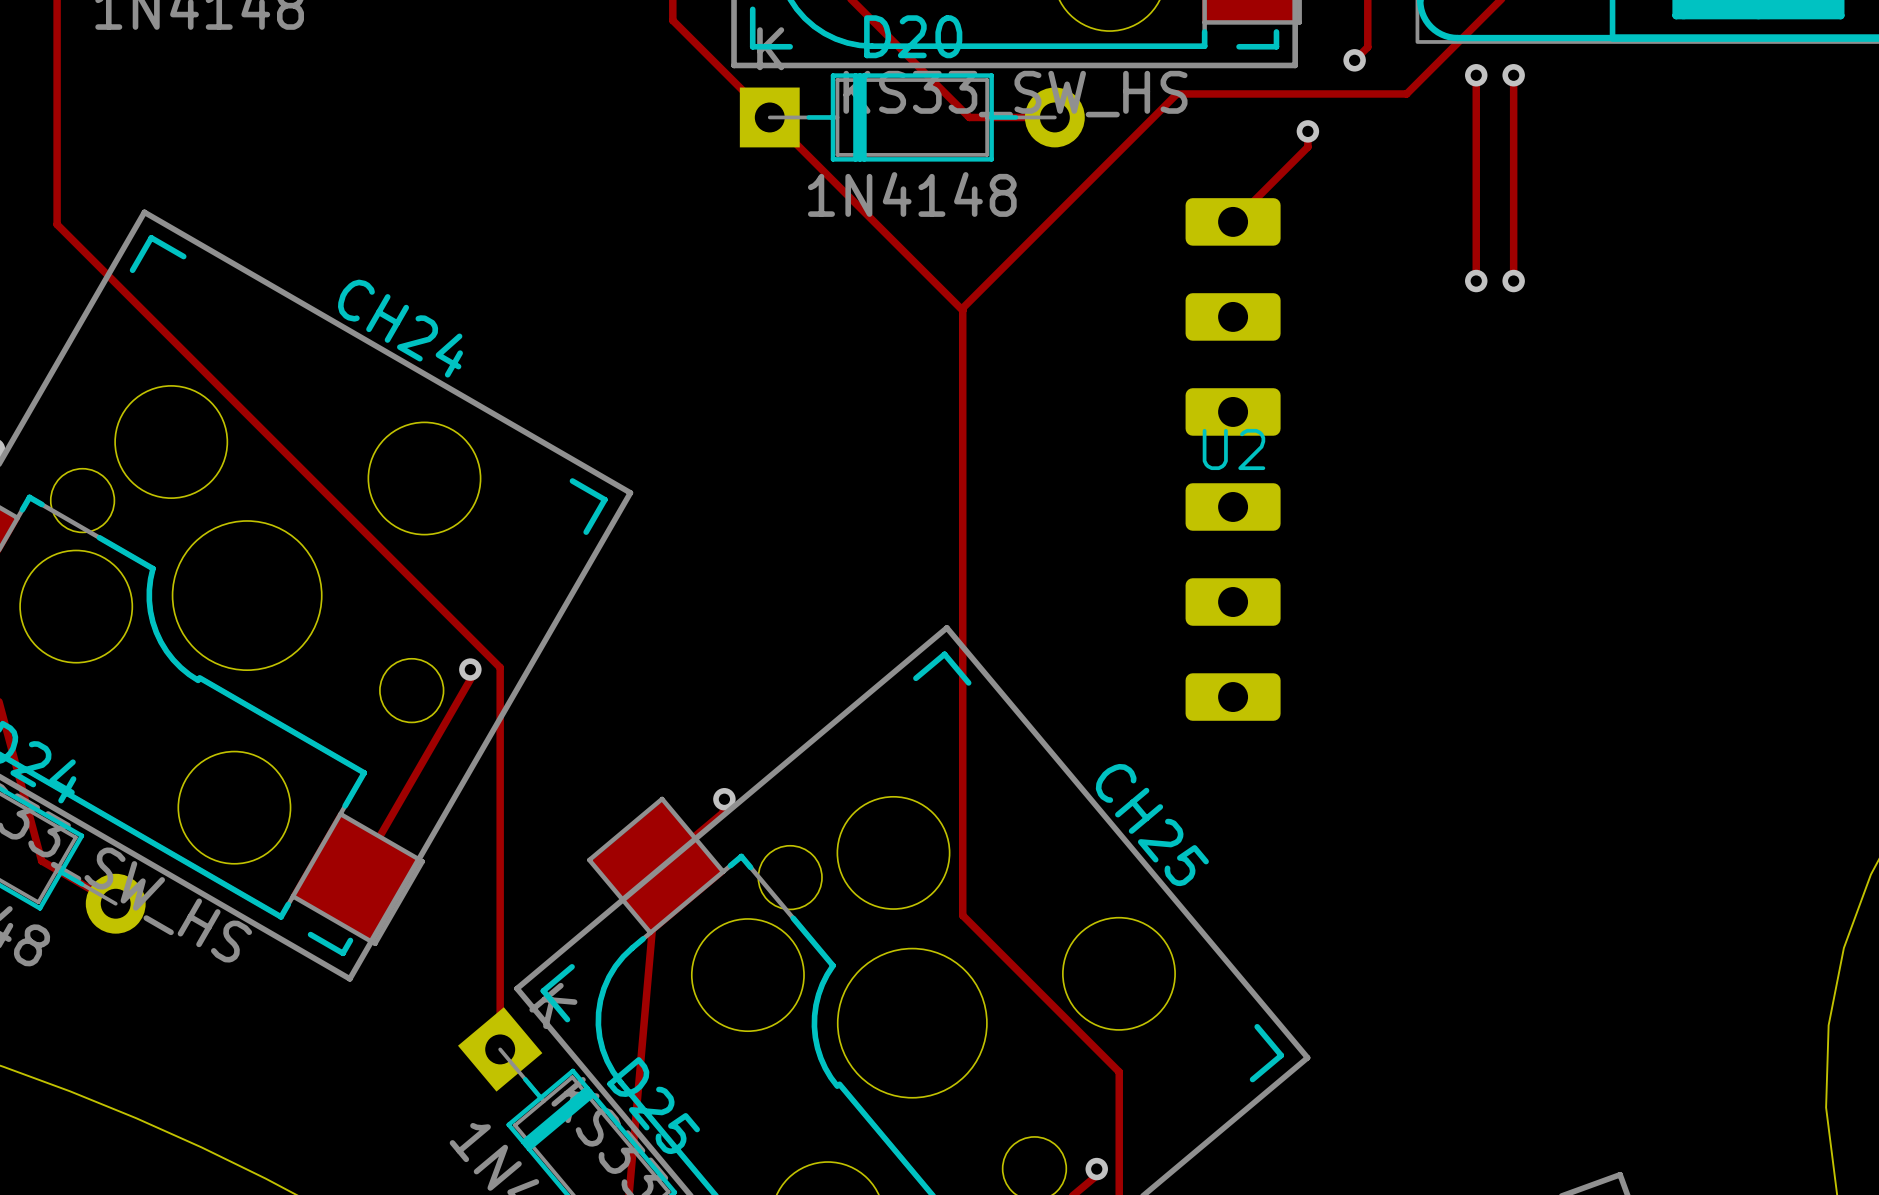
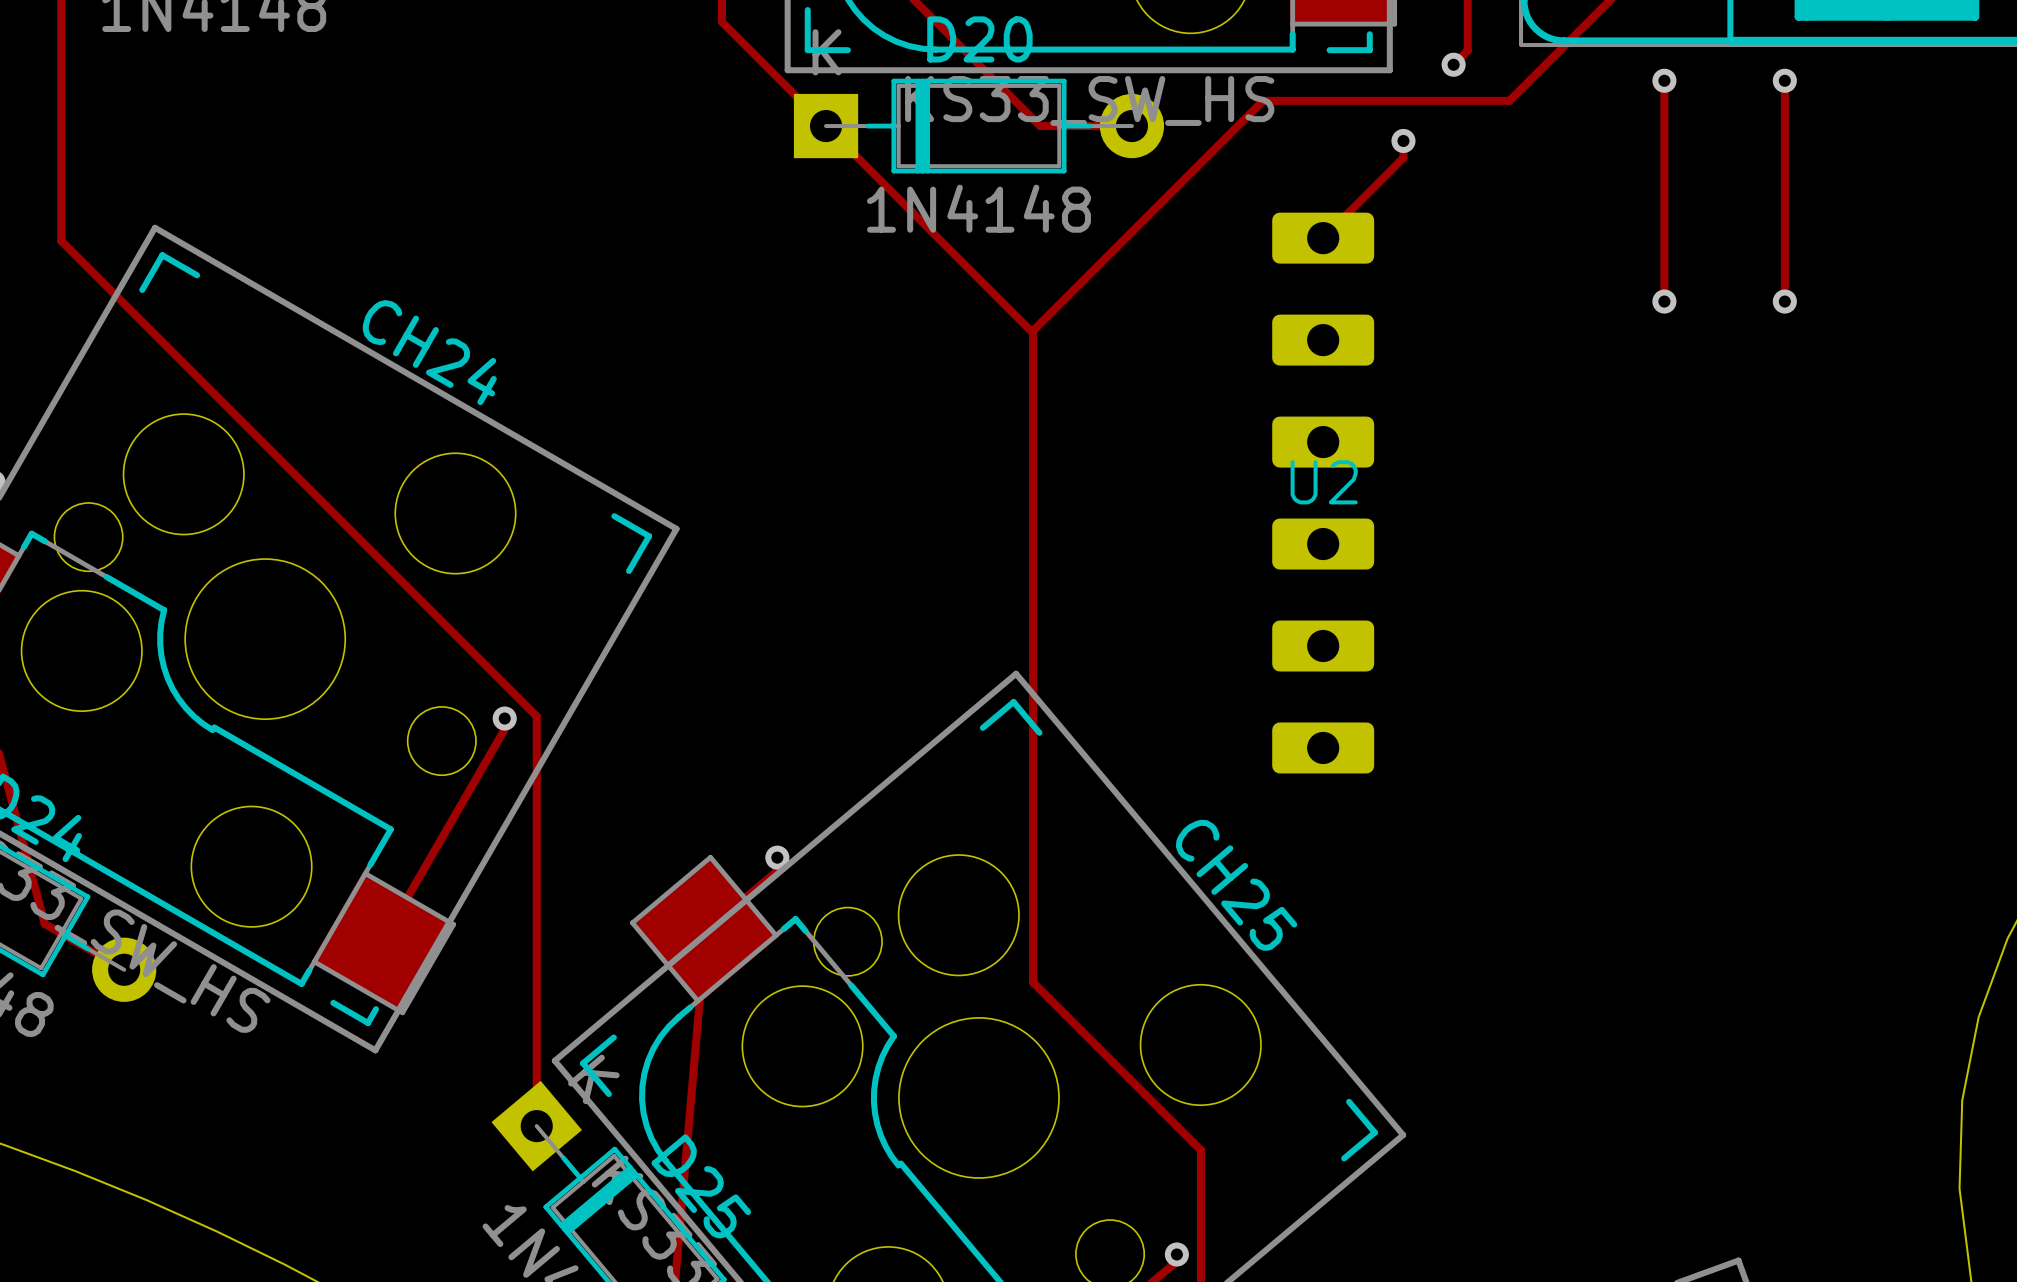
track: (1476, 75) (1476, 281) -> (1784, 80) (1784, 301)
via: (1476, 75) -> none
track: (1513, 75) (1513, 281) -> (1664, 80) (1664, 301)
via: (1513, 75) -> none
via: none -> (1664, 80)
via: none -> (1784, 80)
via: (1476, 281) -> none
via: (1513, 281) -> none
via: none -> (1664, 301)
via: none -> (1784, 301)

